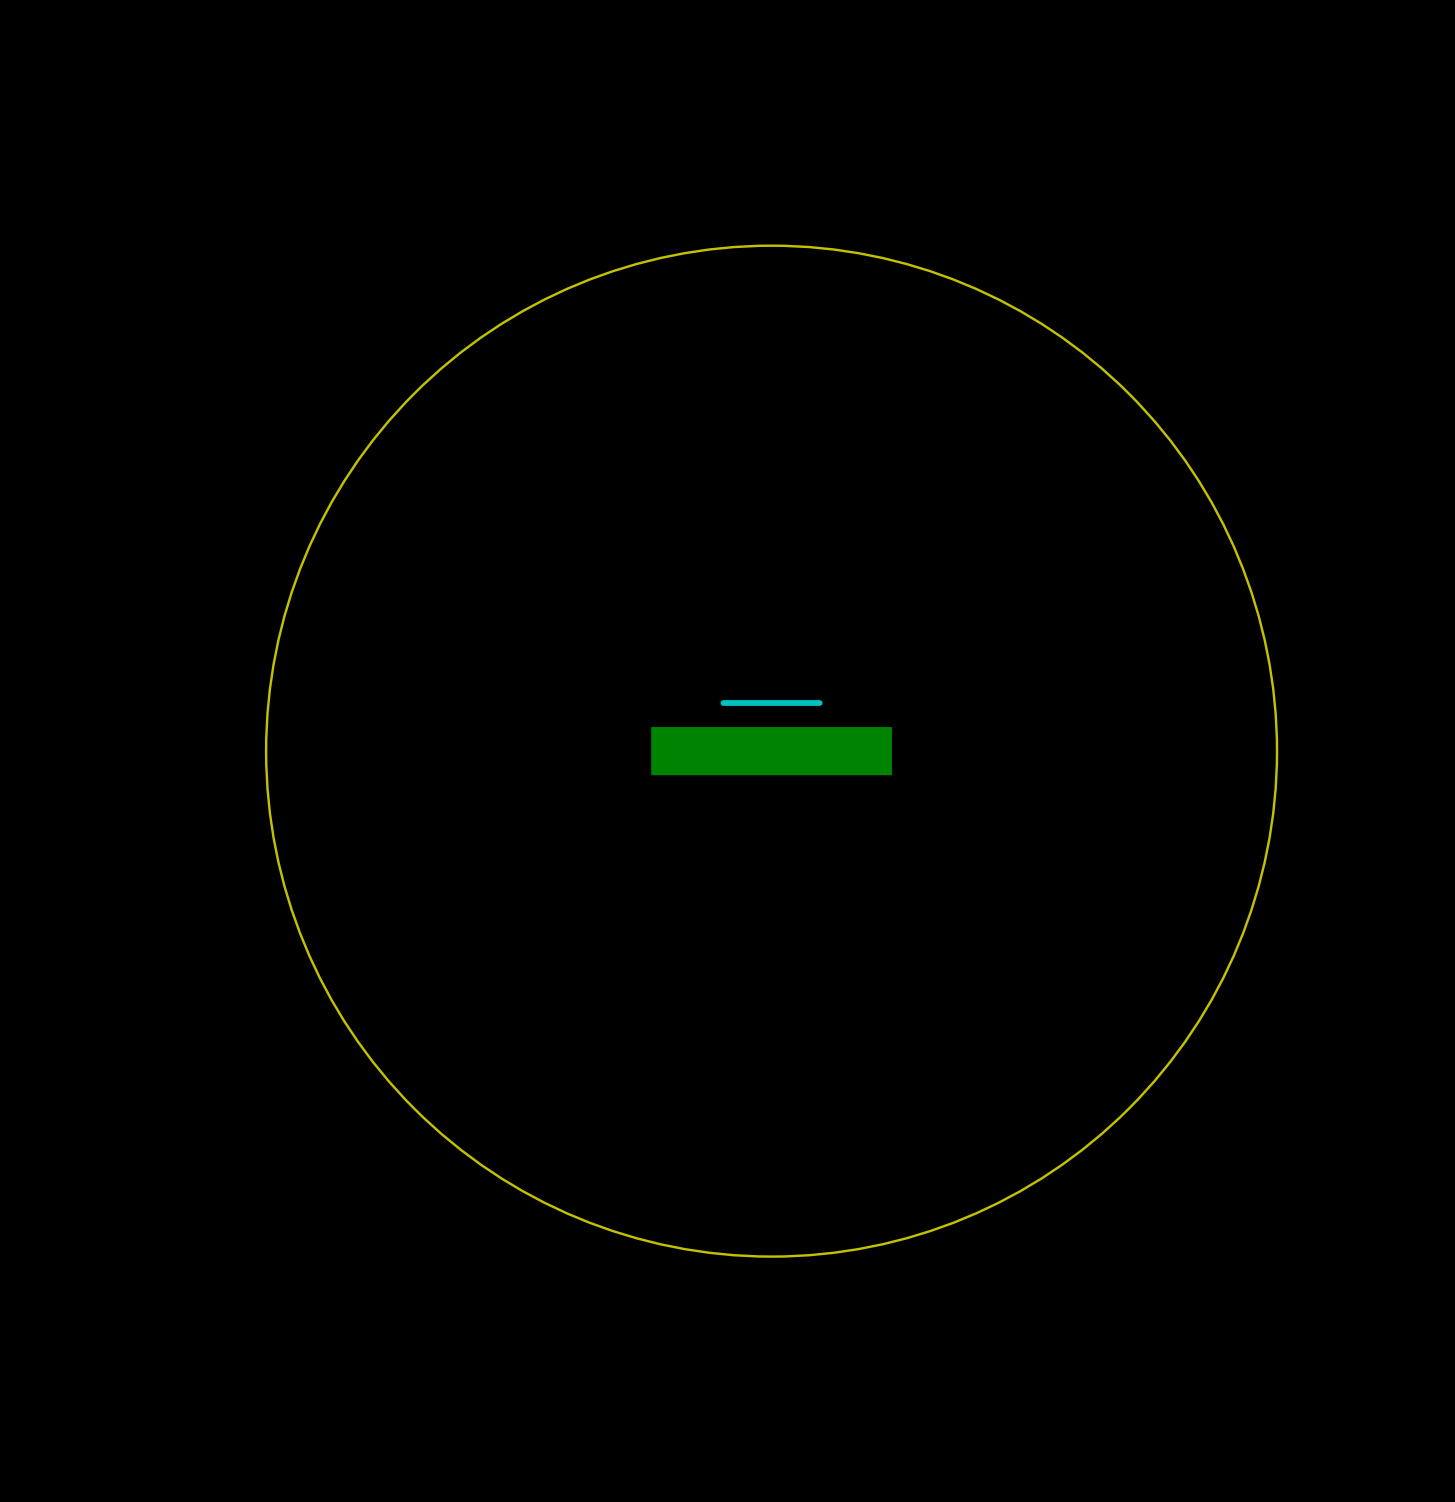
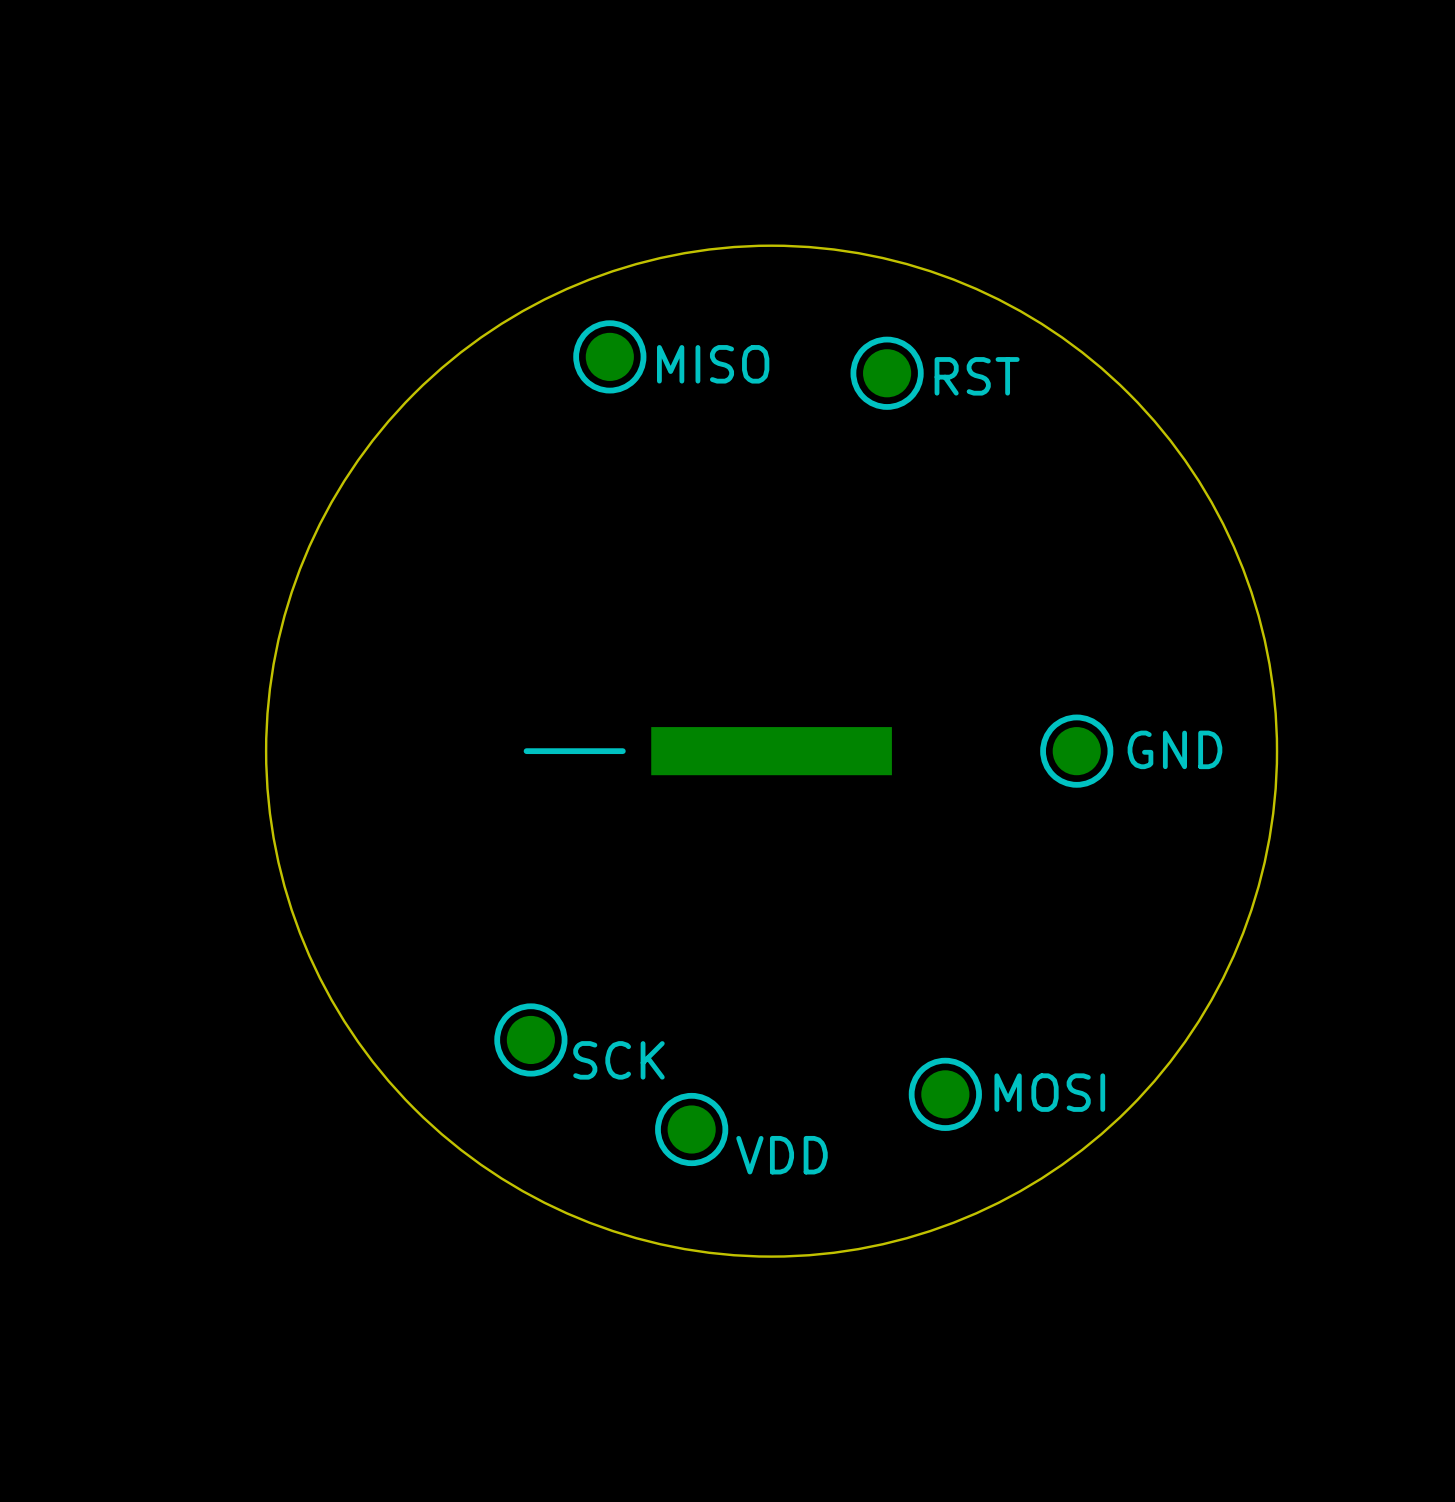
part: none -> MISO (609, 356)
part: none -> RST (887, 373)
line: (819, 703) (723, 703) -> (622, 751) (526, 751)
part: none -> GND (1076, 751)
part: none -> SCK (530, 1039)
part: none -> MOSI (945, 1094)
part: none -> VDD (691, 1129)

